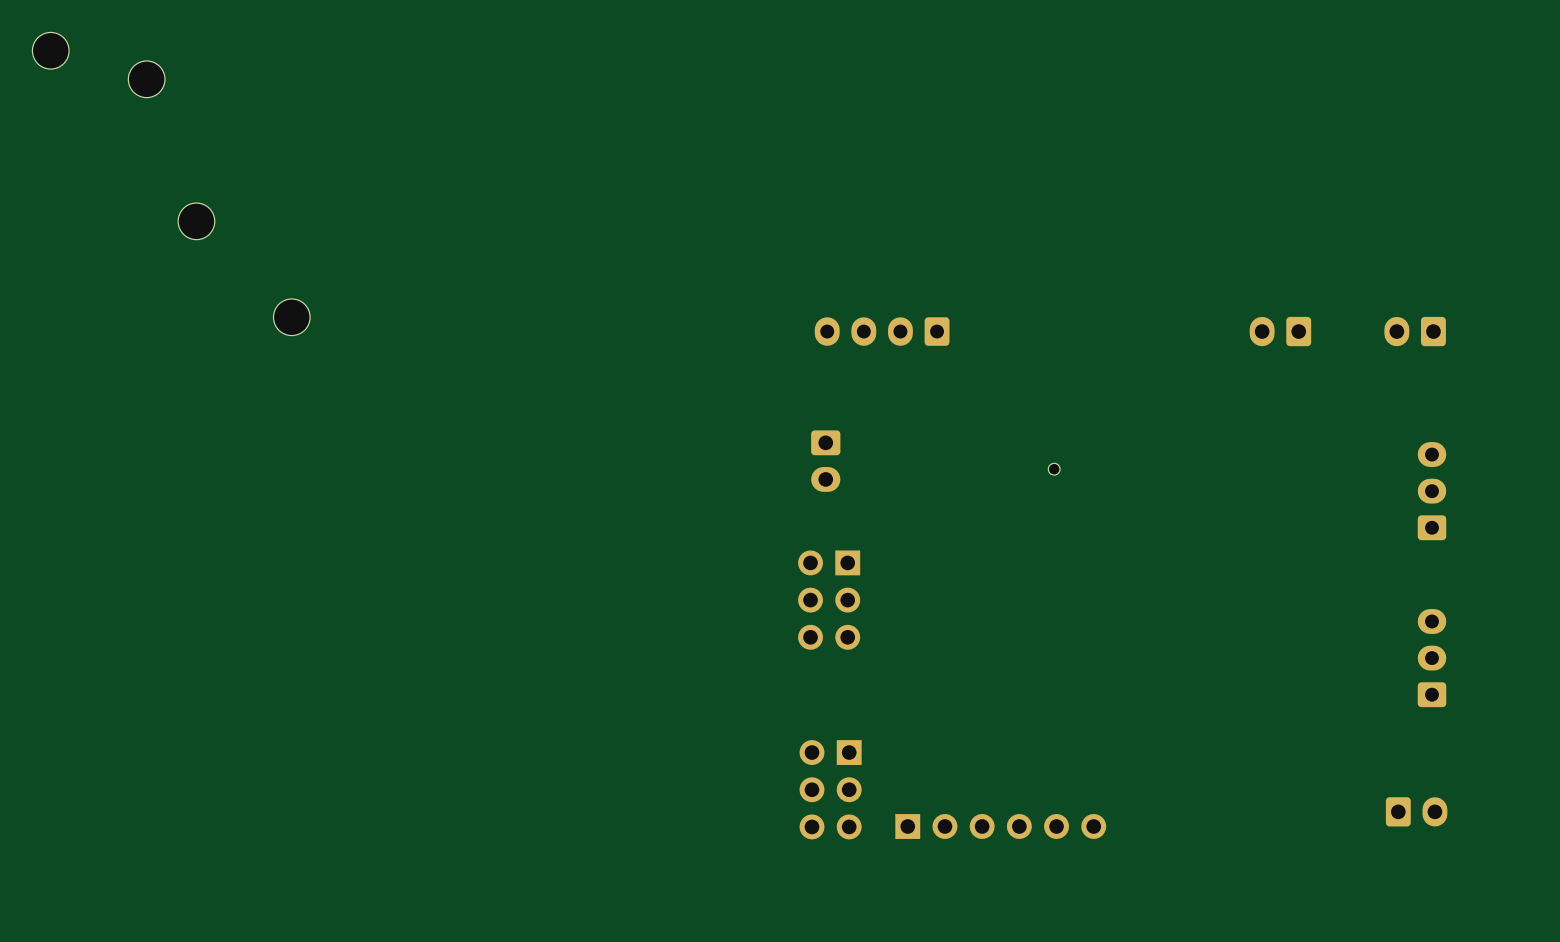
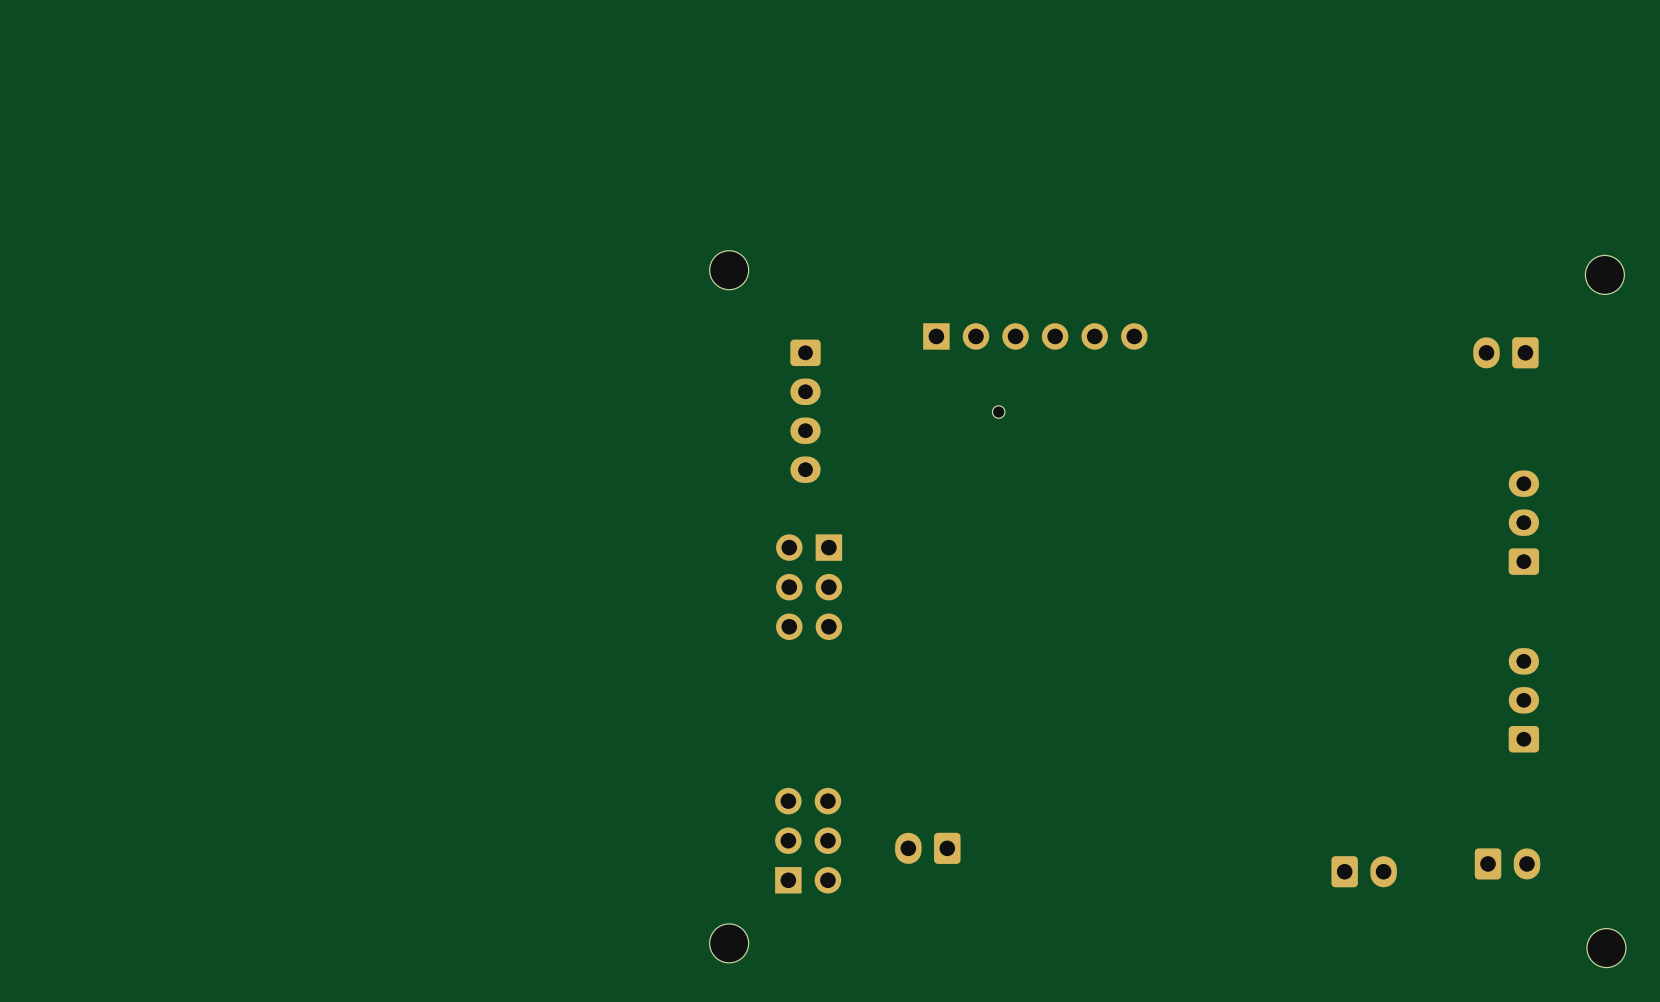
part: (50, 50) -> none
part: (146, 79) -> none
part: (196, 221) -> none
part: none -> (729, 270)
part: none -> (1604, 274)
part: none -> (1035, 336)
part: (291, 317) -> none
part rotation: 0° (882, 331) -> 90° counterclockwise (805, 411)
part position: (882, 331) -> (805, 411)
part: (1280, 331) -> none
part: (825, 461) -> none
part position: (1054, 469) -> (998, 412)
part position: (829, 600) -> (809, 587)
part rotation: 0° (830, 789) -> 180° (808, 840)
part position: (830, 789) -> (808, 840)
part: none -> (927, 848)
part: none -> (1364, 871)
part: (1000, 826) -> none
part: none -> (729, 943)
part: none -> (1606, 948)

